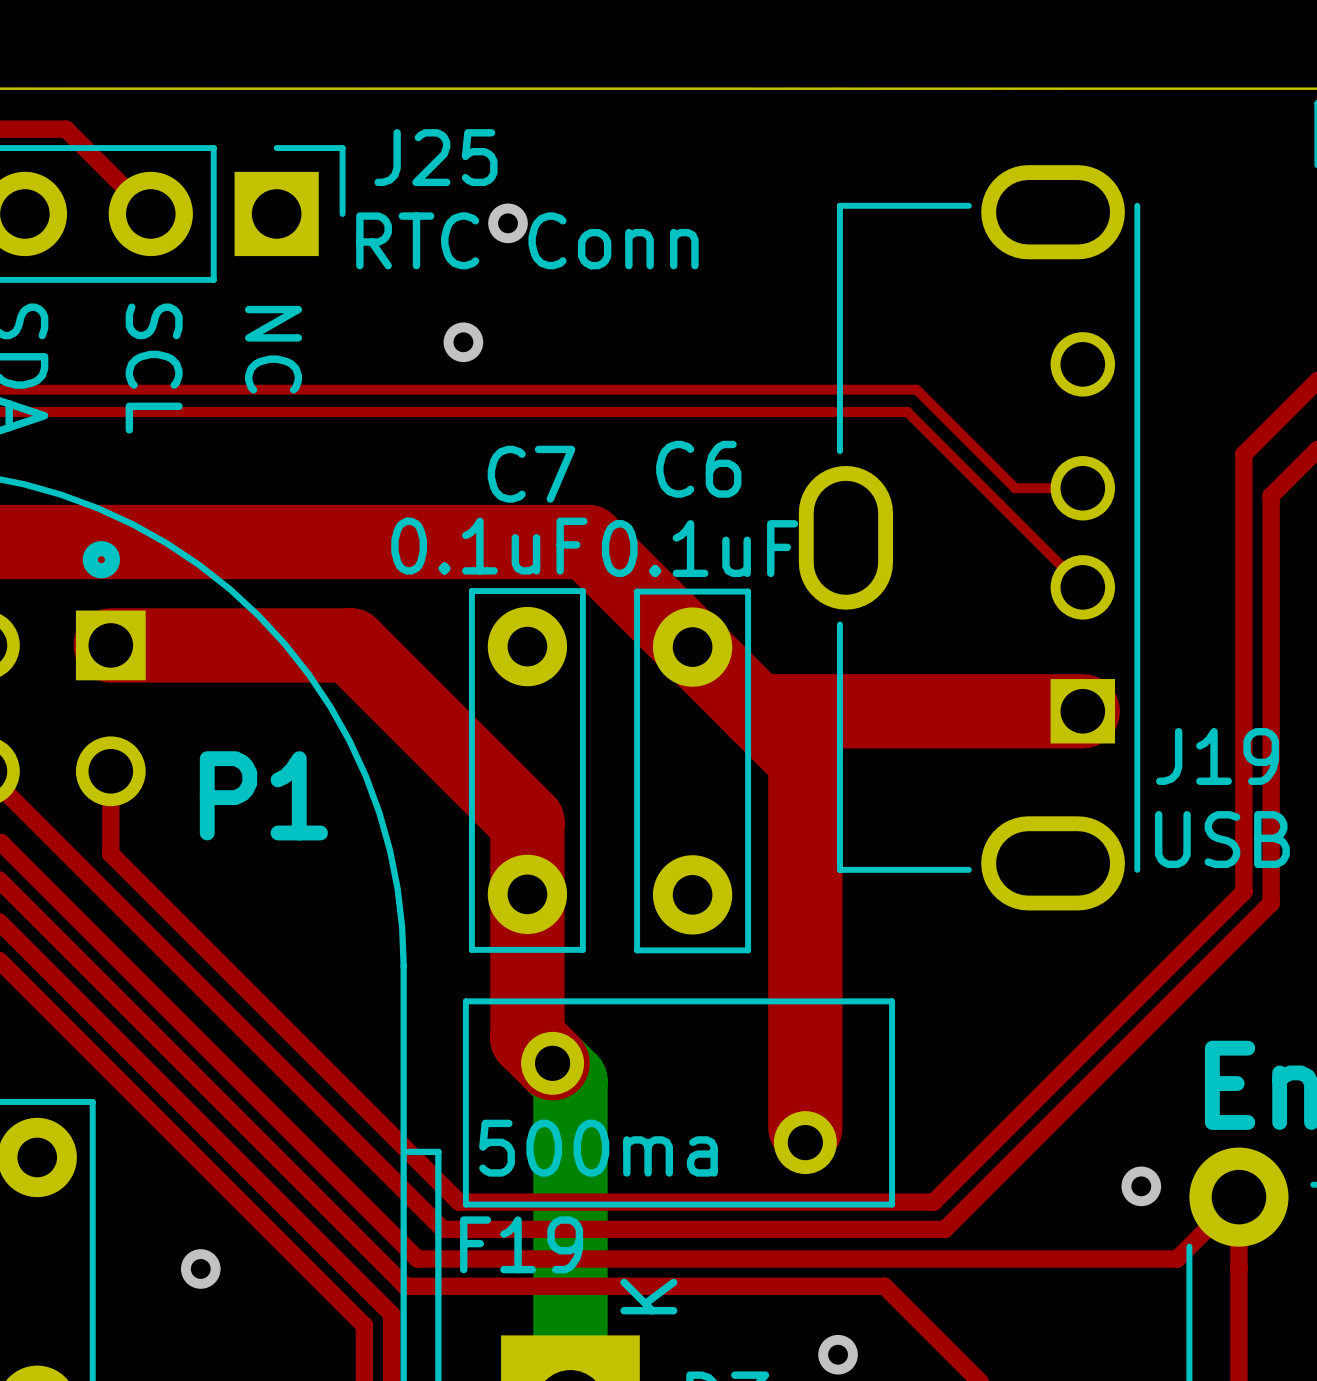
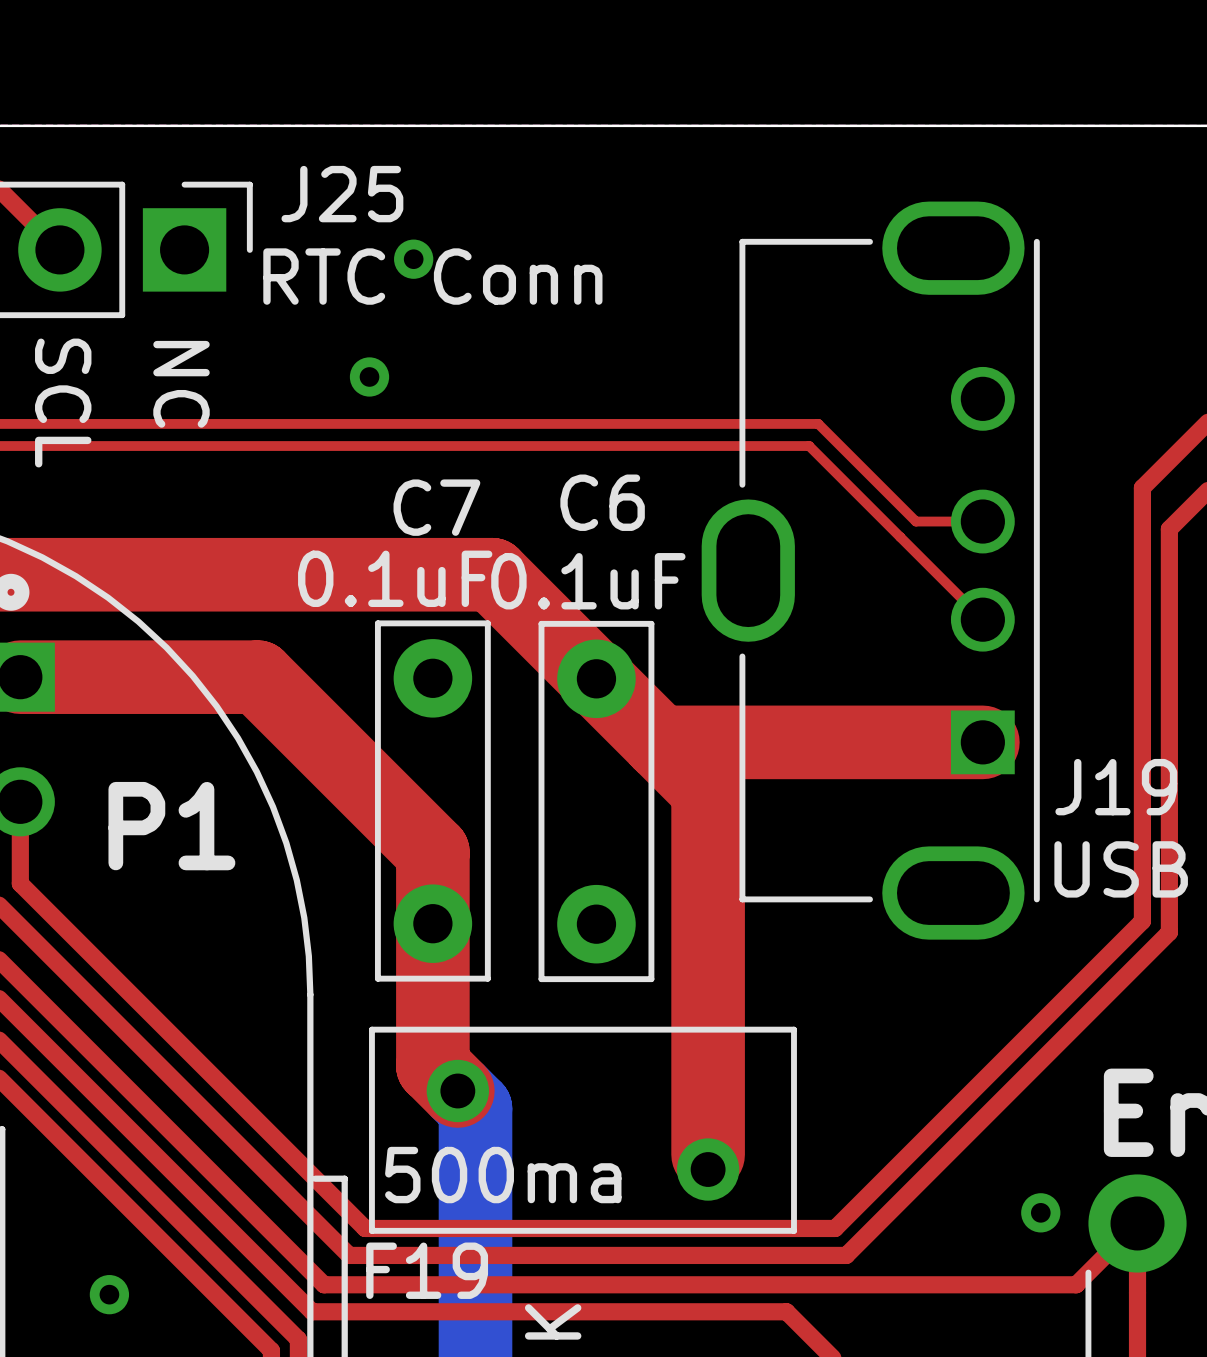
C6 value position: 0.1uF (699, 548) -> 0.1uF (588, 581)

